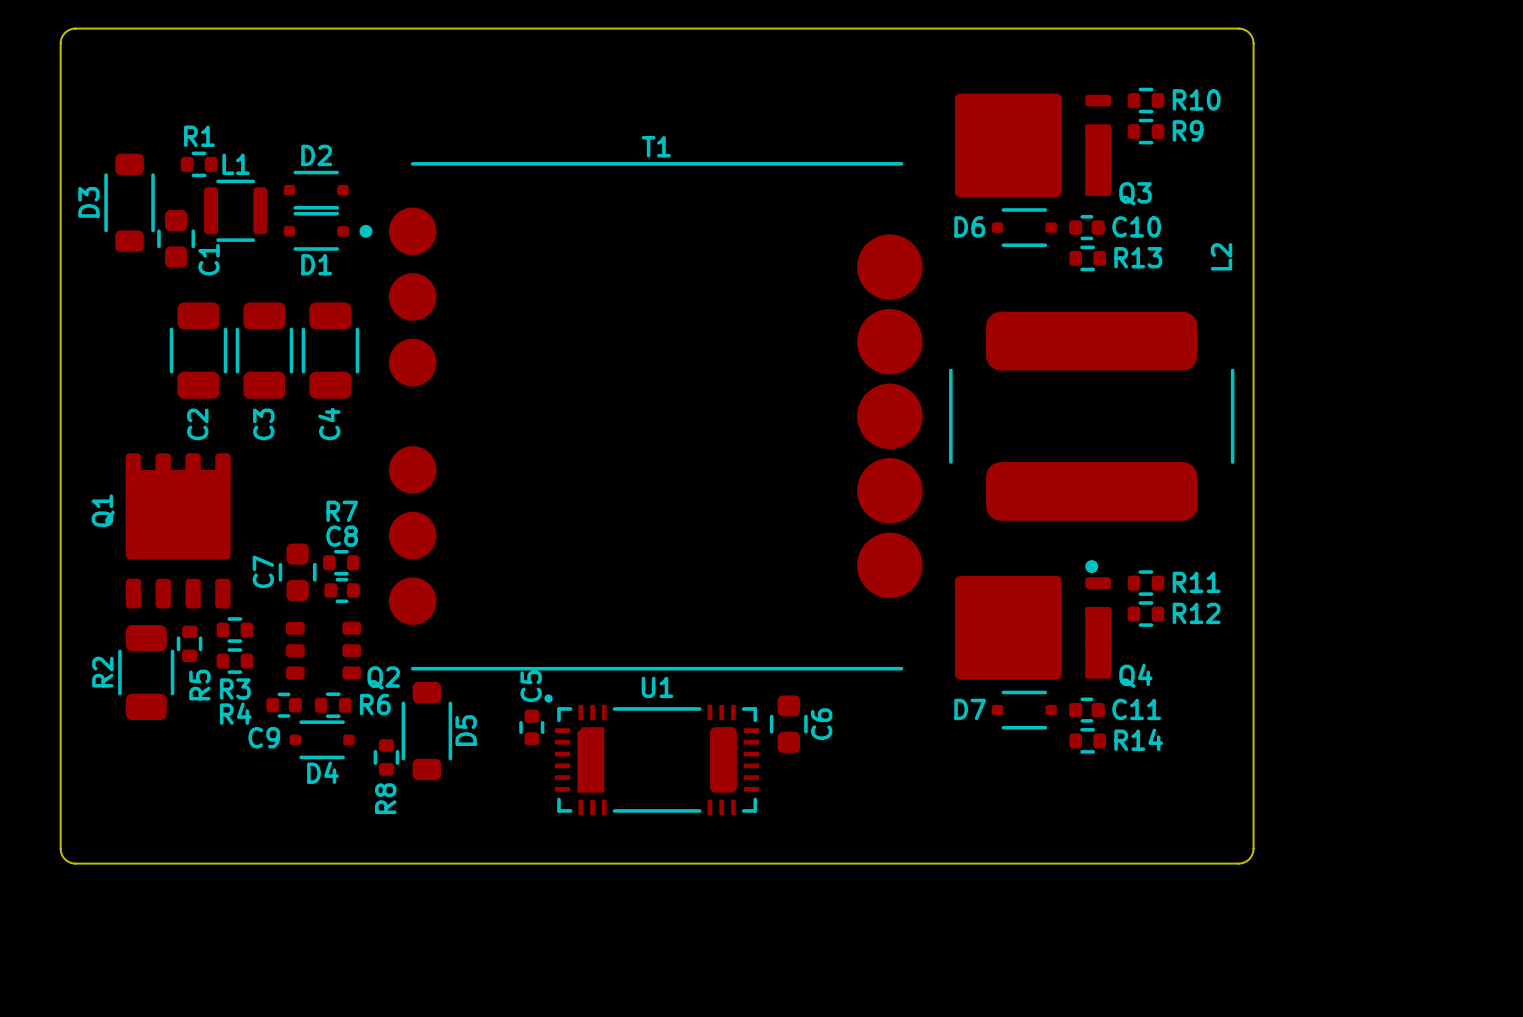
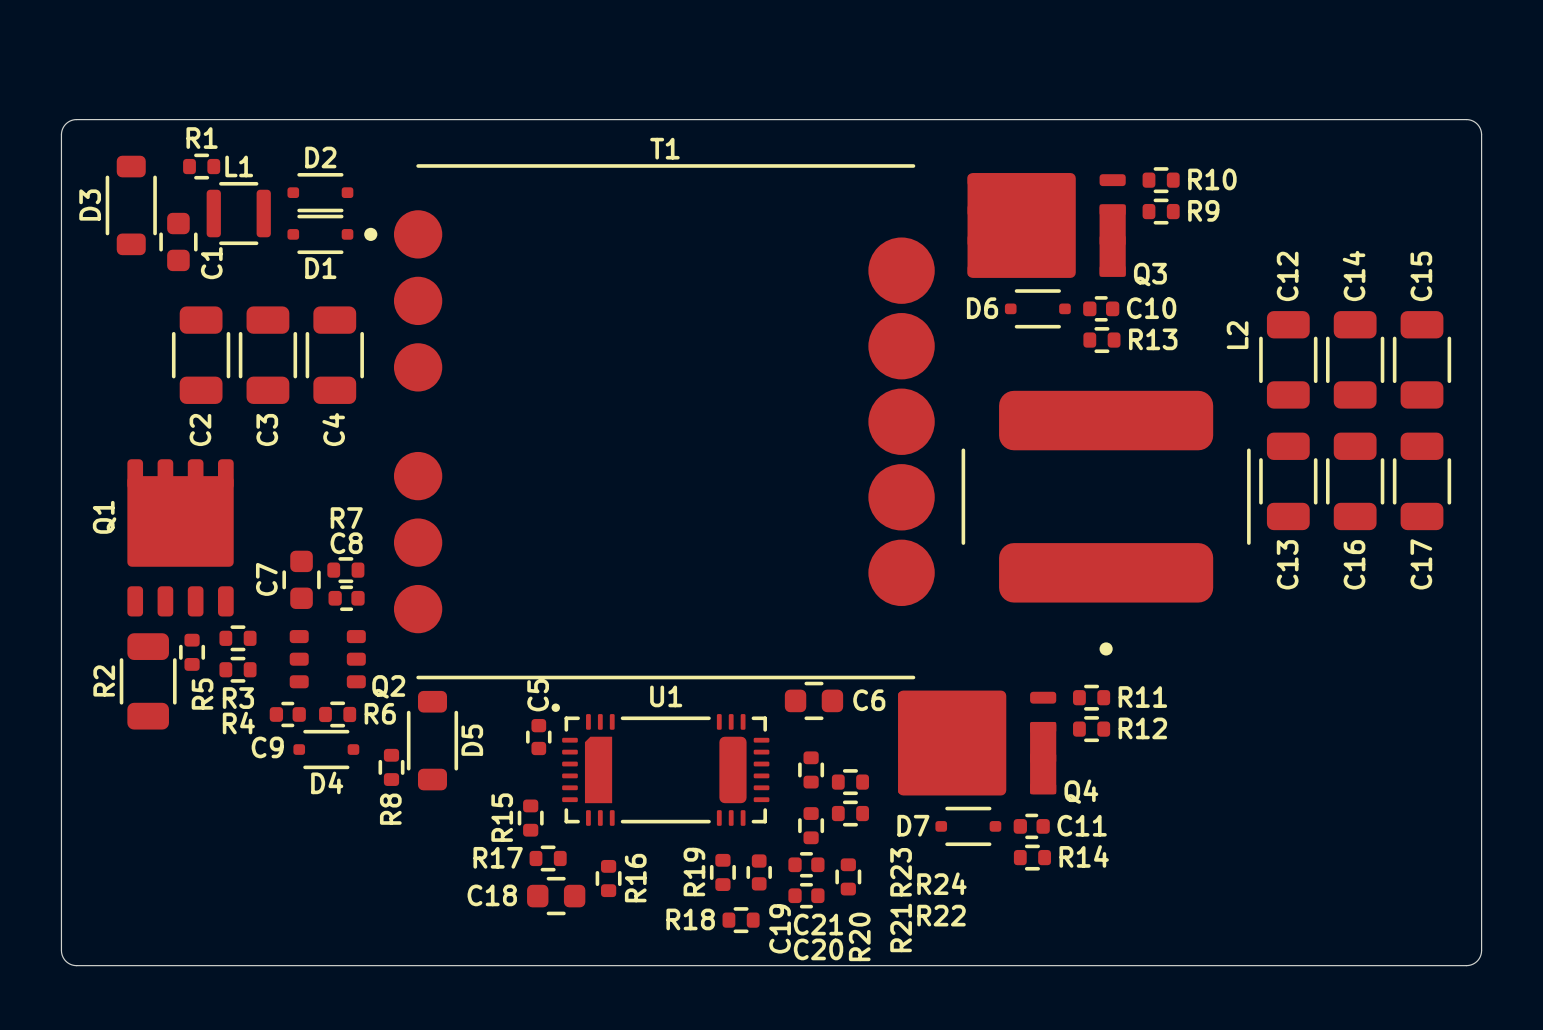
R10 position: (1146, 100) -> (1161, 180)
R9 position: (1146, 131) -> (1161, 211)
board edge: (60, 132) (60, 41) (65, 32) (73, 28) (1238, 28) (1247, 31) (1253, 41) (1253, 848) (1252, 855) (1246, 861) (1238, 863) (75, 863) (65, 859) (60, 848) -> (61, 134) (65, 124) (76, 119) (1466, 119) (1474, 121) (1480, 128) (1481, 134) (1481, 952) (1475, 962) (1466, 965) (74, 965) (65, 961) (61, 952) (61, 859)
Q3 position: (1033, 145) -> (1046, 225)
D6 position: (1024, 227) -> (1037, 308)
C10 position: (1086, 227) -> (1101, 308)
R13 position: (1087, 258) -> (1101, 340)
C12: none -> (1288, 359)
C14: none -> (1355, 359)
C15: none -> (1422, 359)
L2 position: (1091, 442) -> (1106, 523)
C13: none -> (1288, 481)
C16: none -> (1355, 481)
C17: none -> (1422, 481)
R11 position: (1145, 583) -> (1091, 697)
R12 position: (1145, 614) -> (1091, 729)
Q4 position: (1033, 627) -> (977, 743)
D7 position: (1024, 710) -> (968, 826)
C11 position: (1086, 710) -> (1031, 826)
C6 rotation: 0° (788, 724) -> 90° clockwise (813, 700)
C6 position: (788, 724) -> (813, 700)
R14 position: (1087, 740) -> (1032, 857)
R23: none -> (811, 769)
R24: none -> (850, 782)
R22: none -> (850, 813)
R15: none -> (530, 818)
R21: none -> (811, 825)
R17: none -> (548, 858)
C21: none -> (806, 864)
R19: none -> (722, 872)
C19: none -> (759, 872)
R20: none -> (848, 876)
R16: none -> (608, 878)
C18: none -> (556, 896)
C20: none -> (806, 895)
R18: none -> (741, 920)

